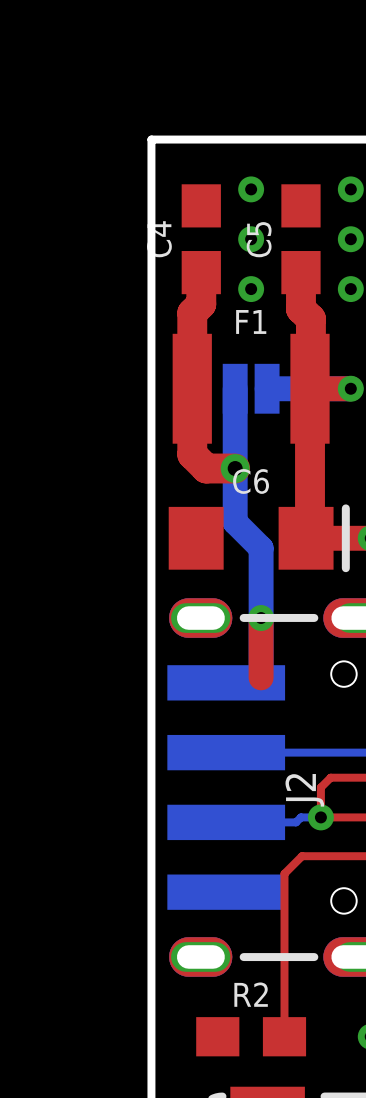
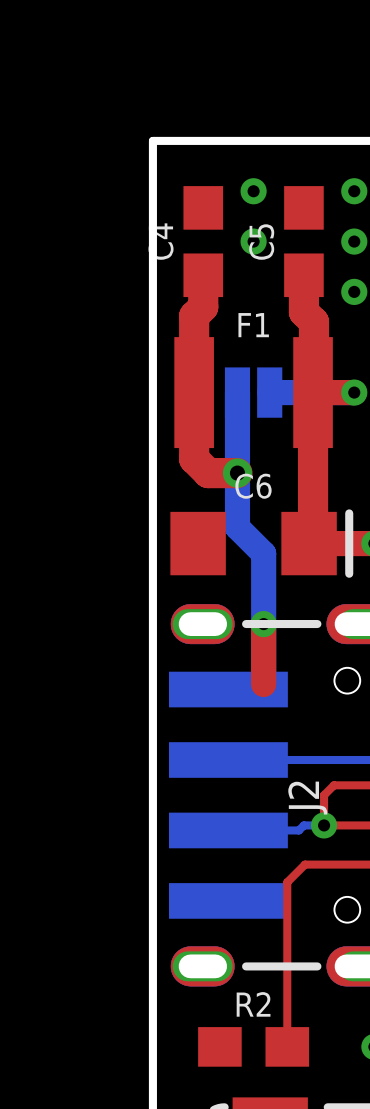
via: (251, 289) -> none

